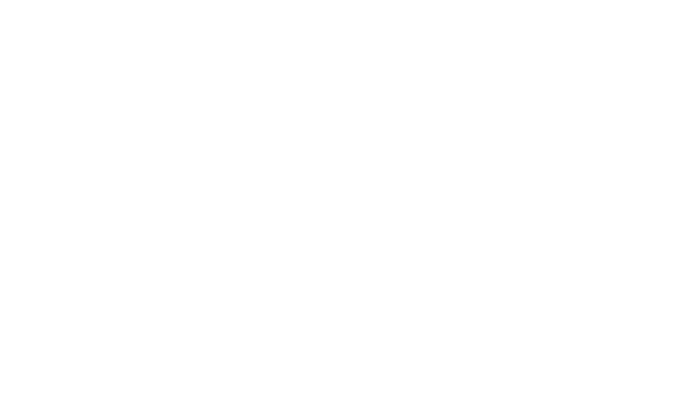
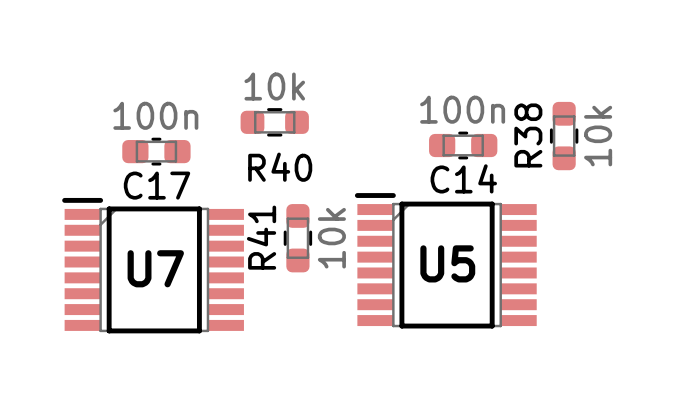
R40: none -> 10k (274, 122)
R38: none -> 10k (564, 136)
C14: none -> 100n (463, 145)
C17: none -> 100n (156, 151)
R41: none -> 10k (297, 238)
U5: none -> (445, 260)
U7: none -> (153, 265)

